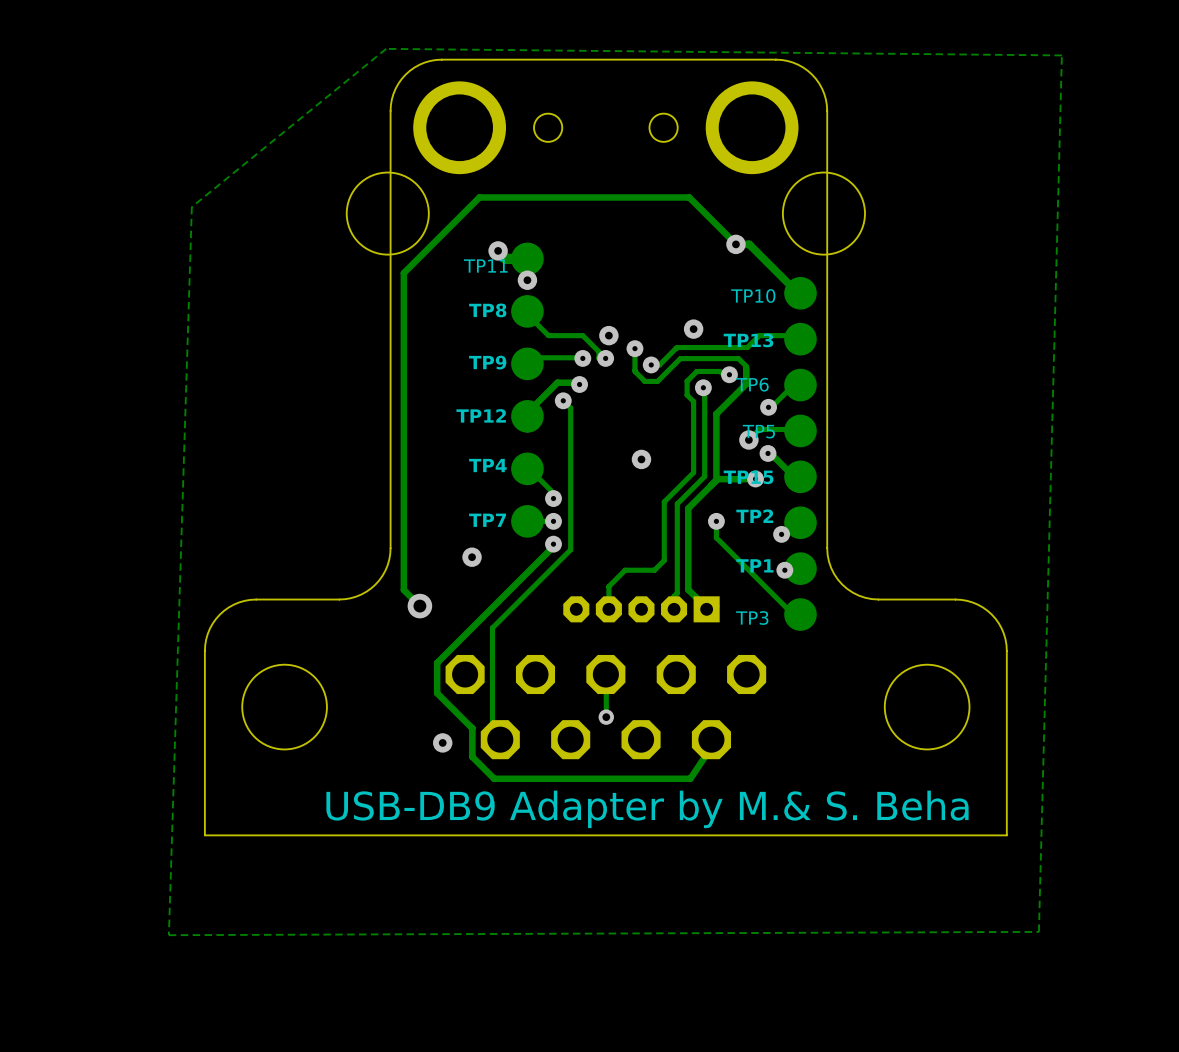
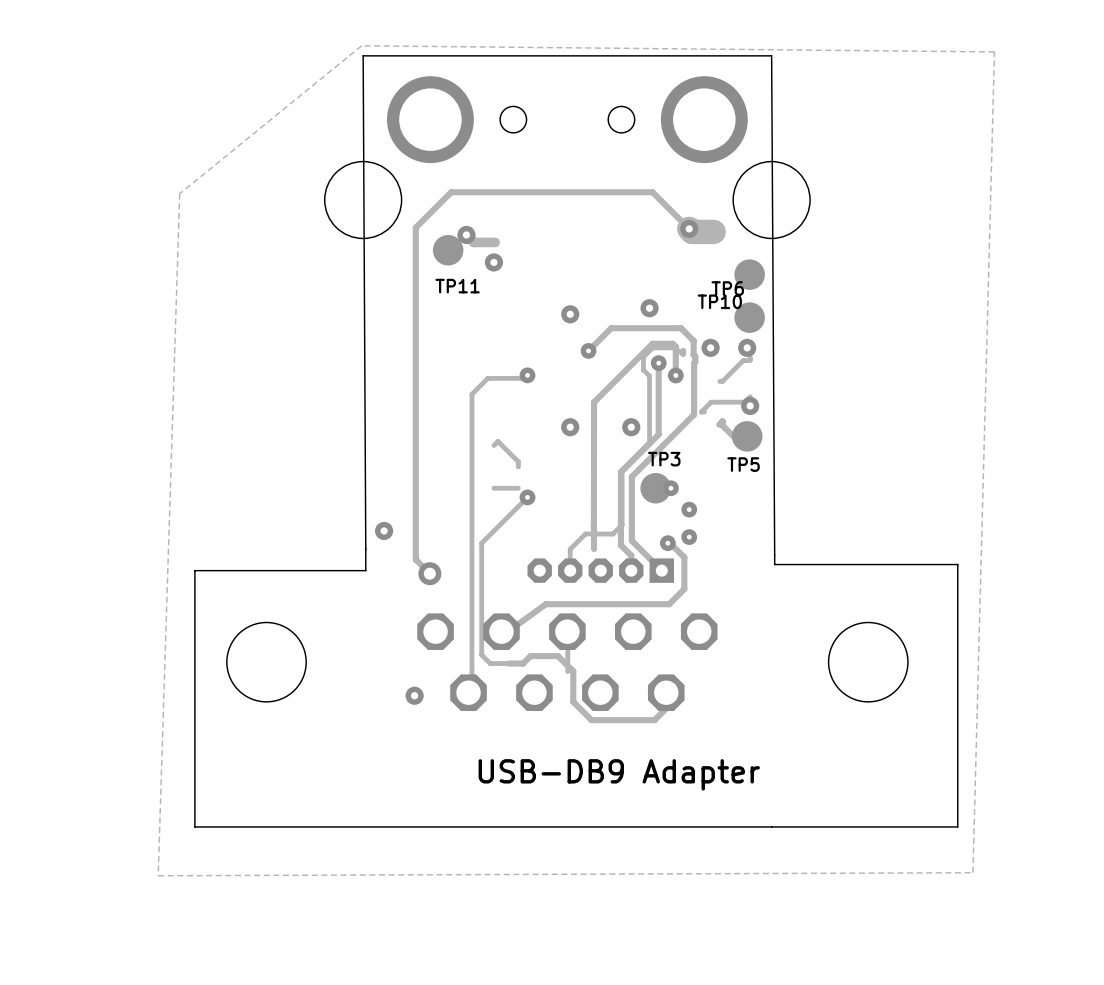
board edge: (775, 59) (792, 62) (807, 70) (822, 88) (826, 105) (827, 548) (828, 561) (837, 579) (847, 588) (858, 595) (878, 599) (966, 600) (982, 607) (998, 623) (1005, 639) (1006, 650) (1006, 835) (204, 835) (204, 650) (207, 633) (212, 623) (228, 607) (244, 600) (339, 599) (356, 596) (375, 584) (387, 565) (390, 548) (390, 105) (395, 88) (405, 74) (419, 64) (441, 59) -> (726, 55) (771, 55) (774, 564) (957, 564) (957, 826) (194, 826) (194, 570) (365, 570) (363, 55) (413, 55)
track: (735, 244) (689, 197) (479, 197) (403, 273) (403, 590) (419, 606) -> none
track: (735, 244) (749, 244) (798, 293) (800, 293) -> none
track: none -> (713, 231) (692, 231) (652, 192) (451, 192) (415, 227) (415, 559) (429, 573)
TP11 position: (527, 258) -> (448, 250)
TP11 name position: TP11 (485, 266) -> TP11 (457, 286)
TP10 name position: TP10 (753, 295) -> TP10 (719, 301)
TP8: (527, 311) -> none
track: (527, 316) (528, 314) (548, 335) (582, 335) (598, 351) (598, 358) (605, 358) -> none
track: (797, 335) (759, 335) (747, 347) (676, 348) -> none
TP13 name: TP13 (748, 340) -> TP6 (727, 288)
track: (634, 348) (634, 370) -> none
via: (634, 348) -> none
track: (676, 348) (659, 364) (651, 364) -> none
track: (582, 358) (530, 358) -> none
via: (582, 358) -> none
via: (605, 358) -> none
TP9: (527, 363) -> none
via: (651, 364) -> none
track: (746, 367) (746, 384) (716, 413) (716, 480) (688, 508) (688, 589) (706, 609) -> (588, 350) (611, 328) (681, 328) (693, 340) (693, 354) (695, 356) (694, 414) (631, 476) (631, 540) (661, 570)
track: (635, 370) (644, 381) (657, 381) (680, 358) (738, 358) (746, 366) (746, 370) -> none
via: none -> (710, 347)
via: none -> (747, 347)
via: none -> (588, 350)
via: (729, 374) -> none
track: (579, 384) (577, 382) (557, 382) (527, 412) (527, 423) -> none
via: (579, 384) -> none
TP6: (800, 385) -> none
track: (703, 387) (704, 476) (677, 503) (677, 593) (674, 596) -> (658, 360) (658, 434) (620, 472) (620, 545) (631, 555) (631, 558)
track: (563, 400) (570, 408) (570, 549) (492, 628) (492, 722) (503, 733) -> (524, 378) (487, 378) (471, 394) (471, 687)
track: none -> (675, 375) (675, 346) (672, 343) (652, 343) (594, 402) (593, 526)
via: none -> (675, 375)
via: (768, 407) -> none
TP12: (527, 416) -> none
TP5 position: (800, 430) -> (747, 436)
TP5 name position: TP5 (758, 431) -> TP5 (743, 464)
via: none -> (750, 405)
via: (748, 440) -> none
via: (768, 453) -> none
via: none -> (570, 427)
via: none -> (631, 427)
via: (641, 459) -> none
TP4: (527, 468) -> none
TP15: (800, 476) -> none
via: (755, 478) -> none
track: (755, 479) (716, 480) -> none
via: (553, 498) -> none
TP7: (527, 521) -> none
via: (553, 521) -> none
track: (716, 521) (716, 537) (791, 612) (804, 612) -> none
TP2: (800, 522) -> none
via: none -> (527, 497)
via: (781, 534) -> none
track: (553, 544) (553, 546) (437, 662) (437, 693) (472, 728) -> none
via: (553, 544) -> none
via: none -> (689, 509)
via position: (472, 557) -> (384, 530)
track: none -> (593, 526) (594, 548)
TP1: (800, 568) -> none
via: (784, 570) -> none
via: none -> (689, 537)
track: none -> (667, 543) (684, 557) (684, 589) (669, 604) (545, 604) (512, 628)
via: none -> (667, 543)
via position: (419, 606) -> (429, 573)
TP3 position: (800, 614) -> (655, 488)
TP3 name position: TP3 (752, 618) -> TP3 (664, 459)
via: (606, 717) -> none
track: (472, 728) (472, 756) (494, 778) (690, 778) (716, 739) (720, 739) -> (527, 497) (481, 543) (481, 655) (490, 663) (523, 663) (530, 656) (558, 656) (573, 671) (573, 701) (591, 720) (654, 720) (675, 699) (675, 692)
text: USB-DB9 Adapter by M.& S. Beha (647, 809) -> USB-DB9 Adapter (619, 774)

